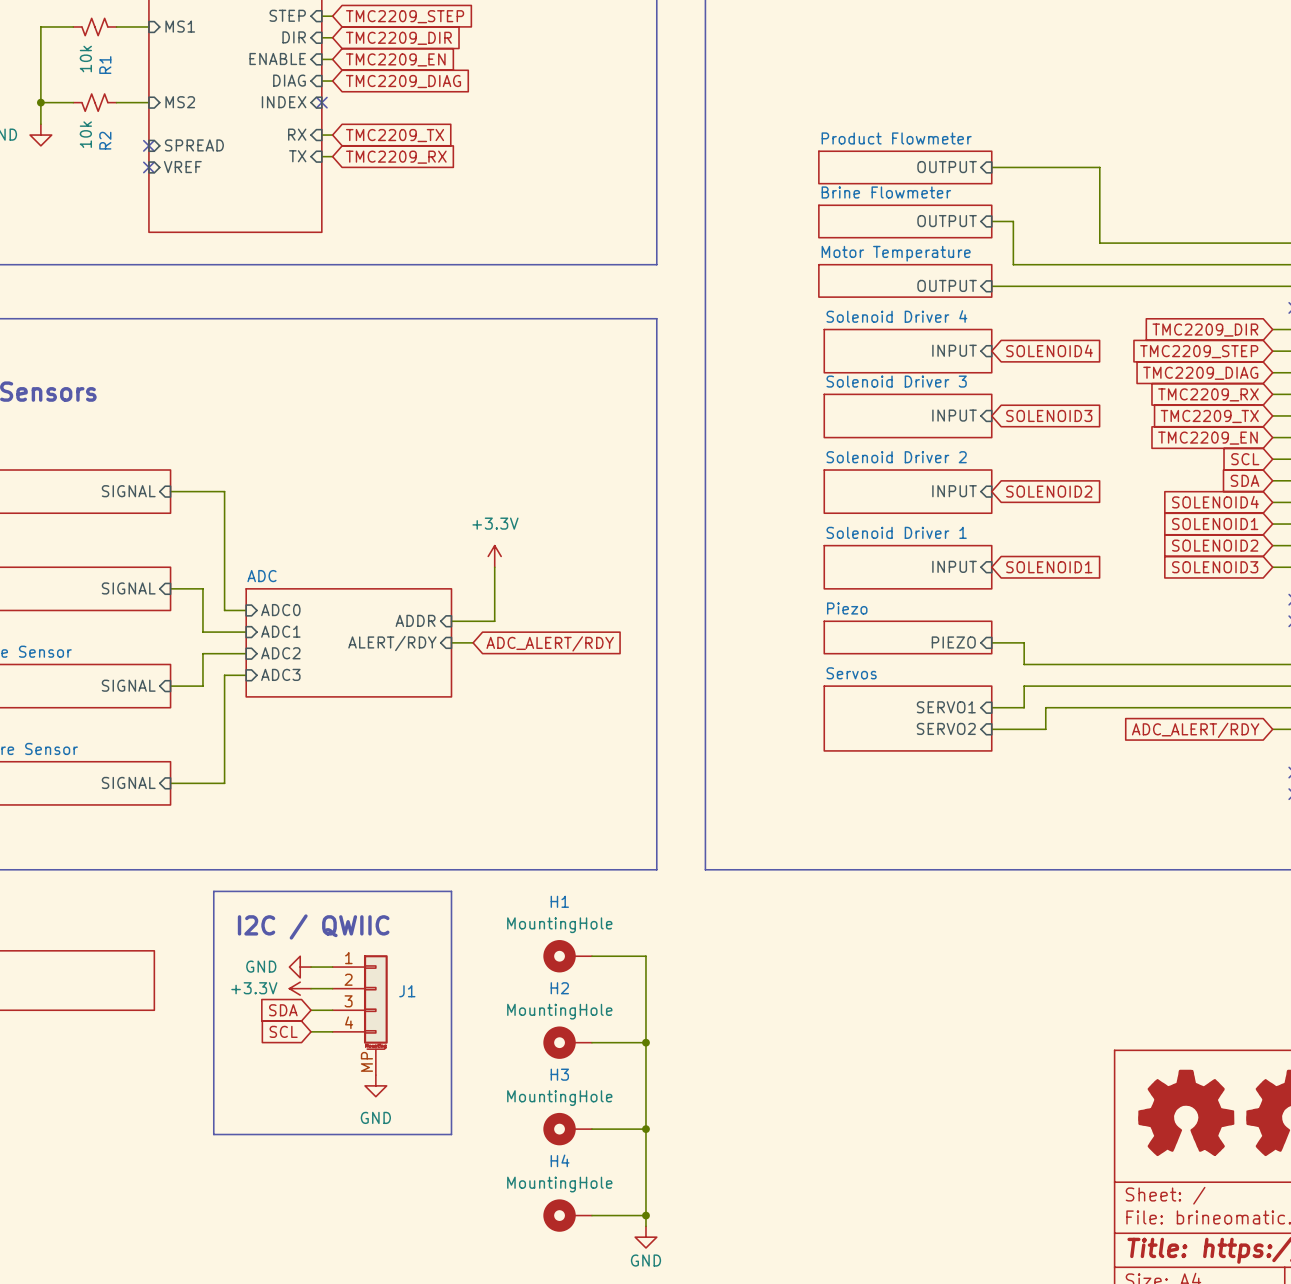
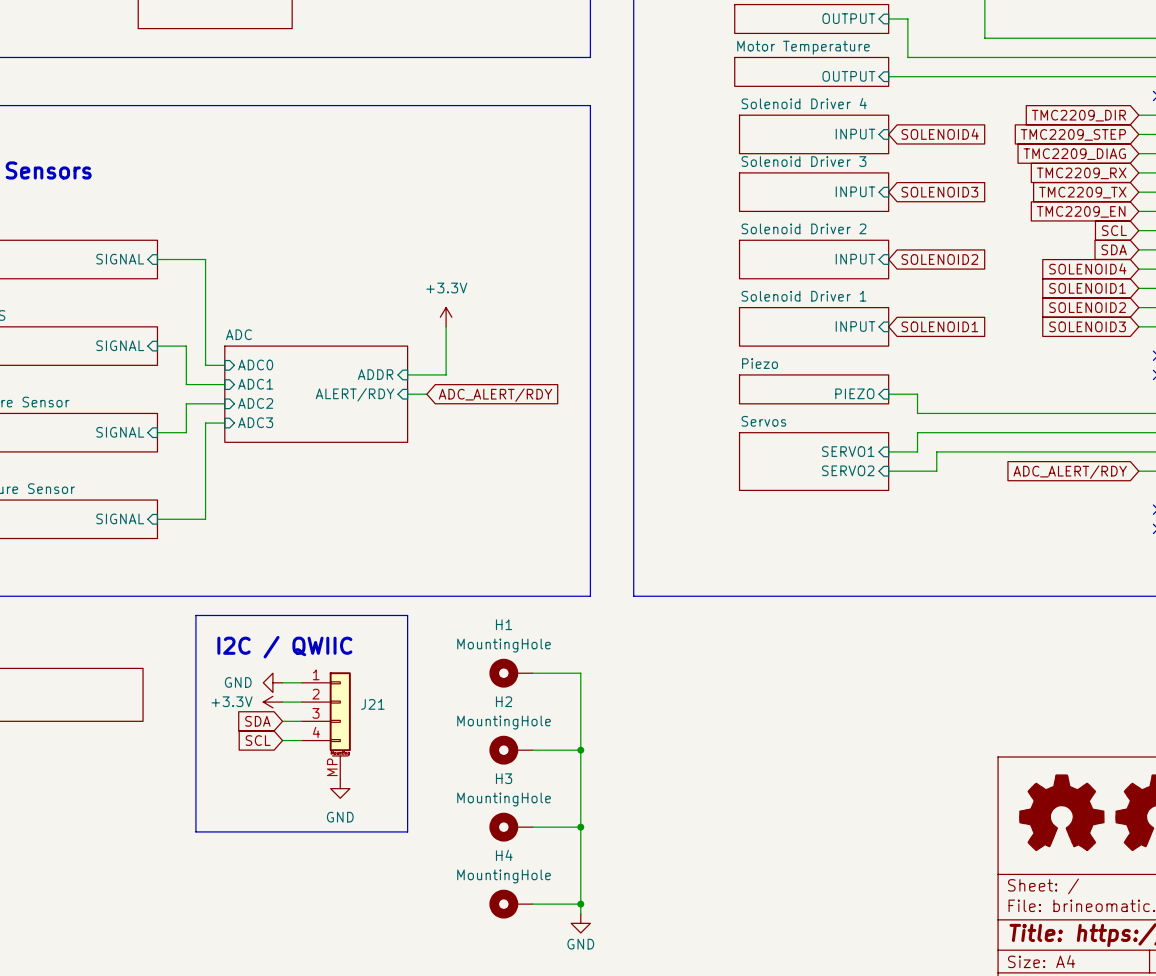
J1 name: J1 (407, 991) -> J21 (372, 704)

